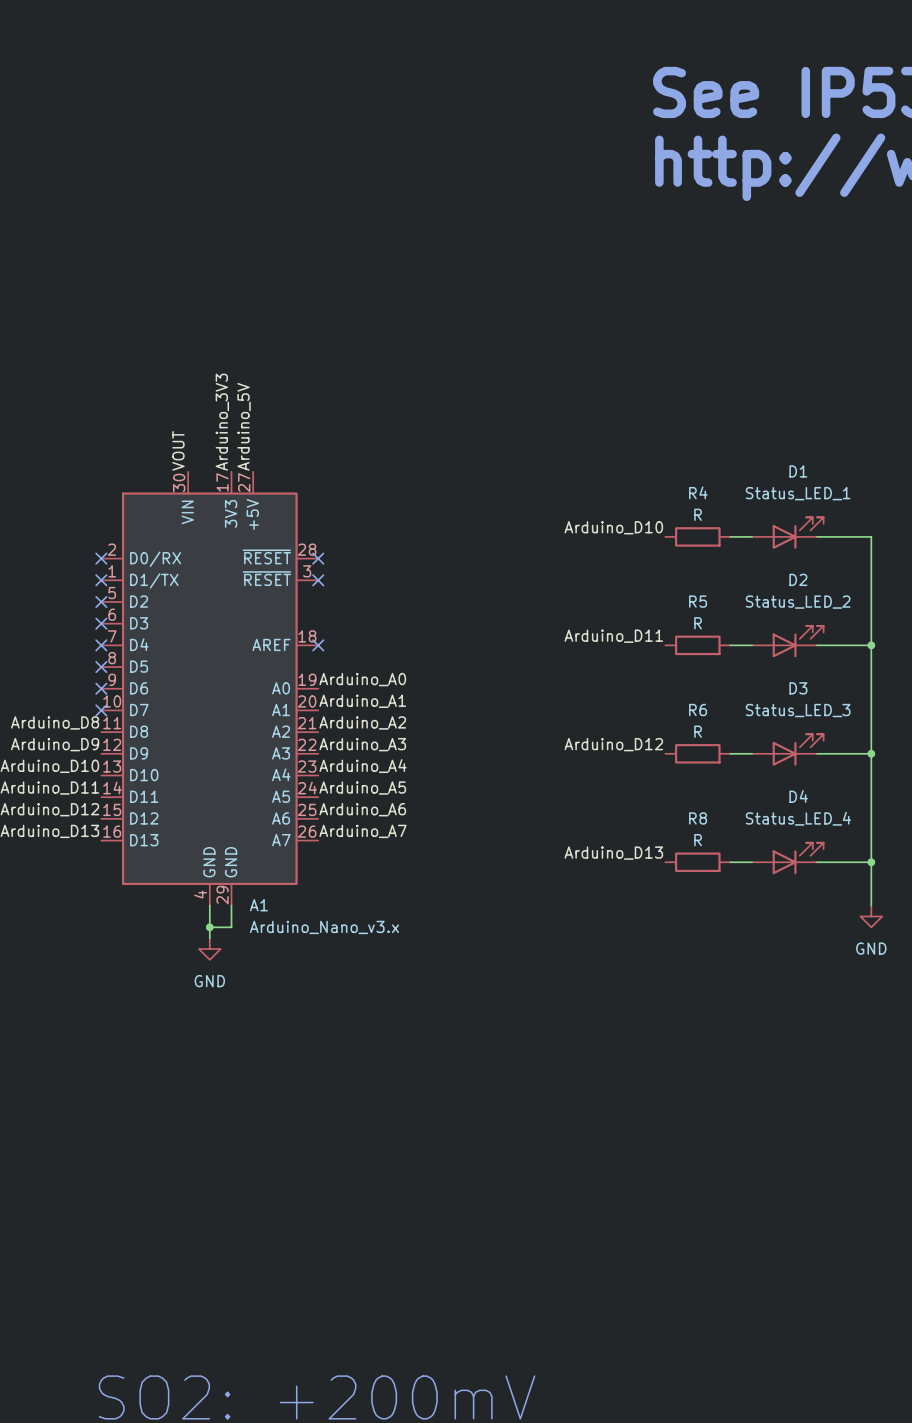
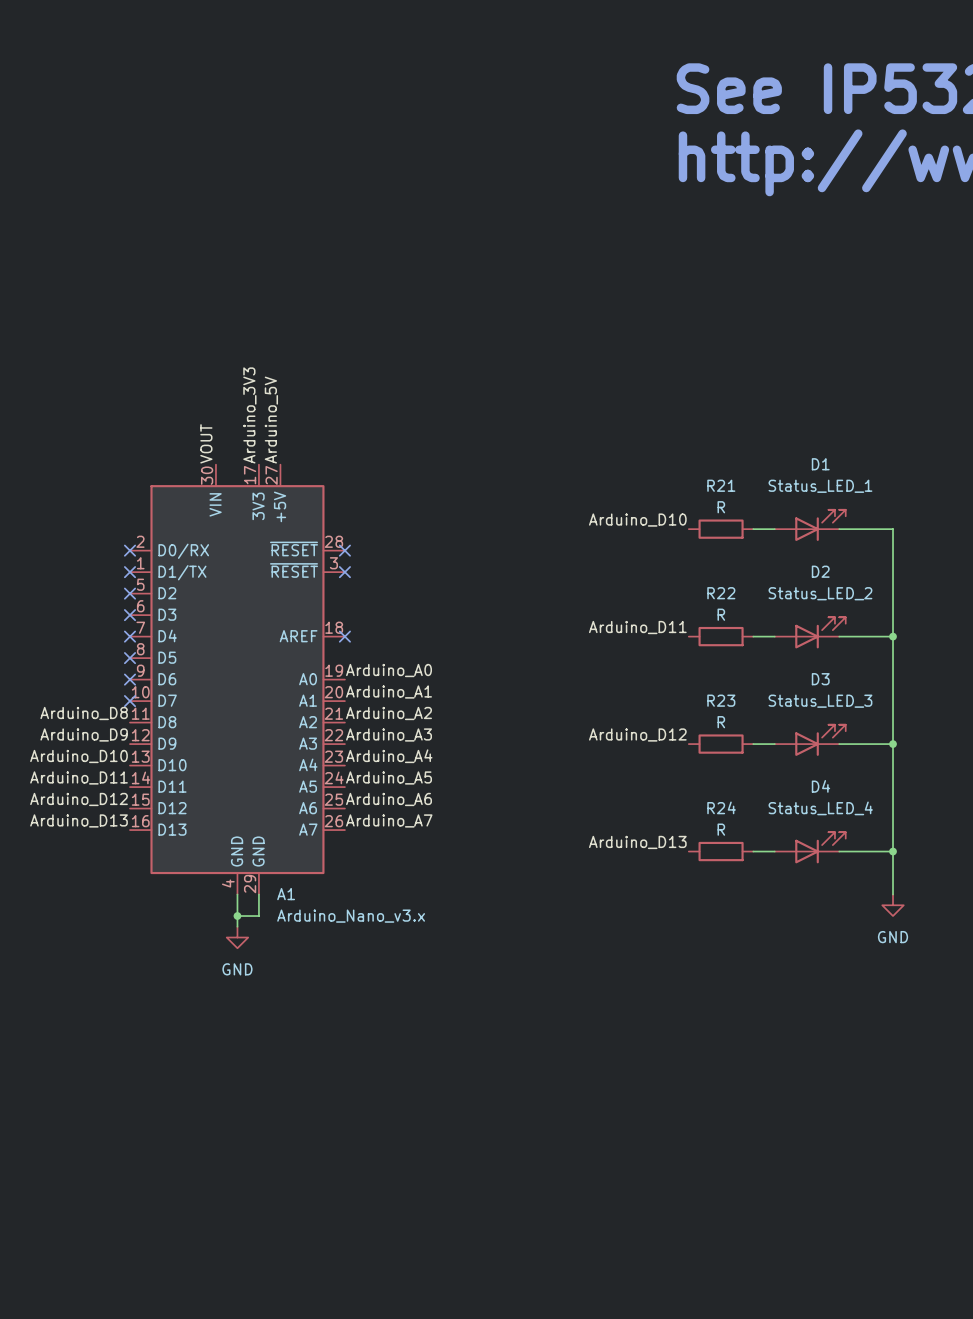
R4 name: R4 (698, 492) -> R21 (721, 485)
R5 name: R5 (698, 601) -> R22 (721, 593)
R6 name: R6 (698, 710) -> R23 (721, 700)
R8 name: R8 (698, 818) -> R24 (721, 807)

